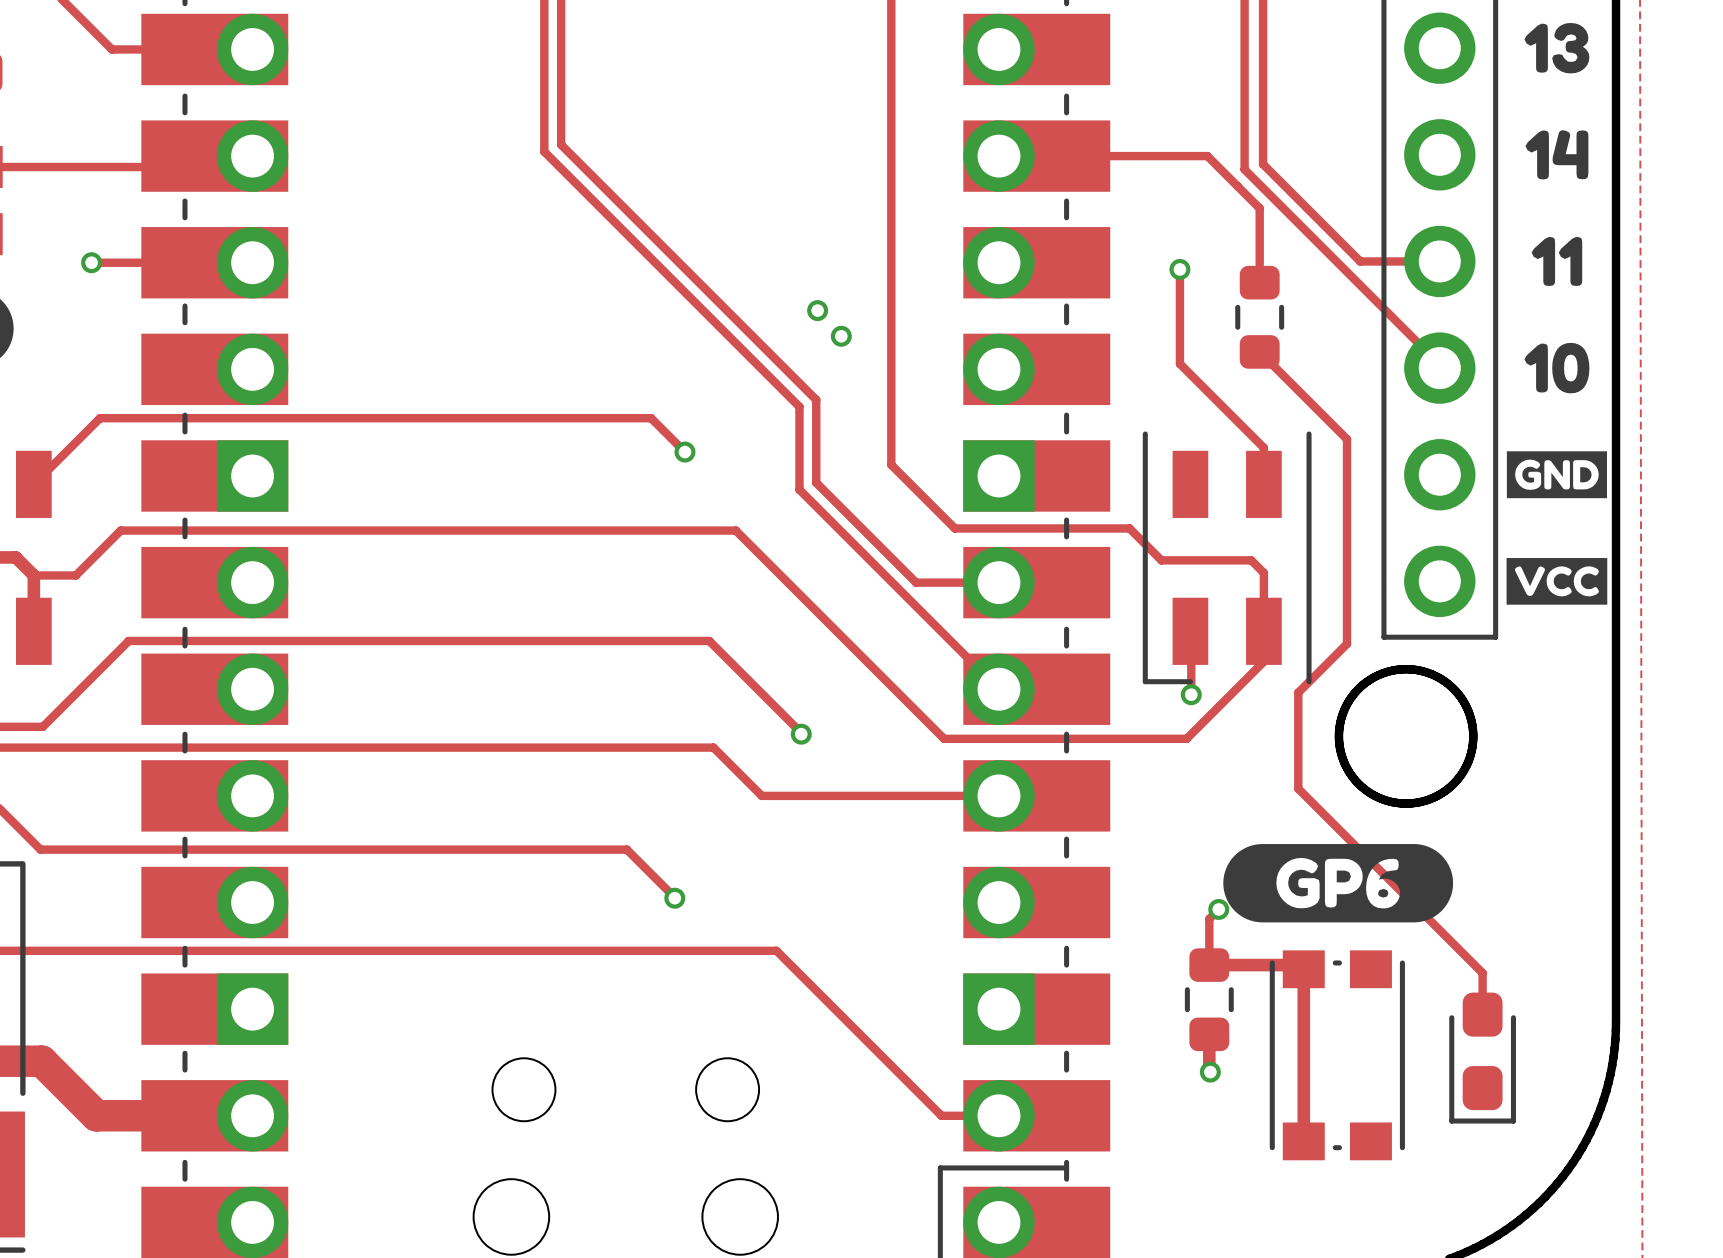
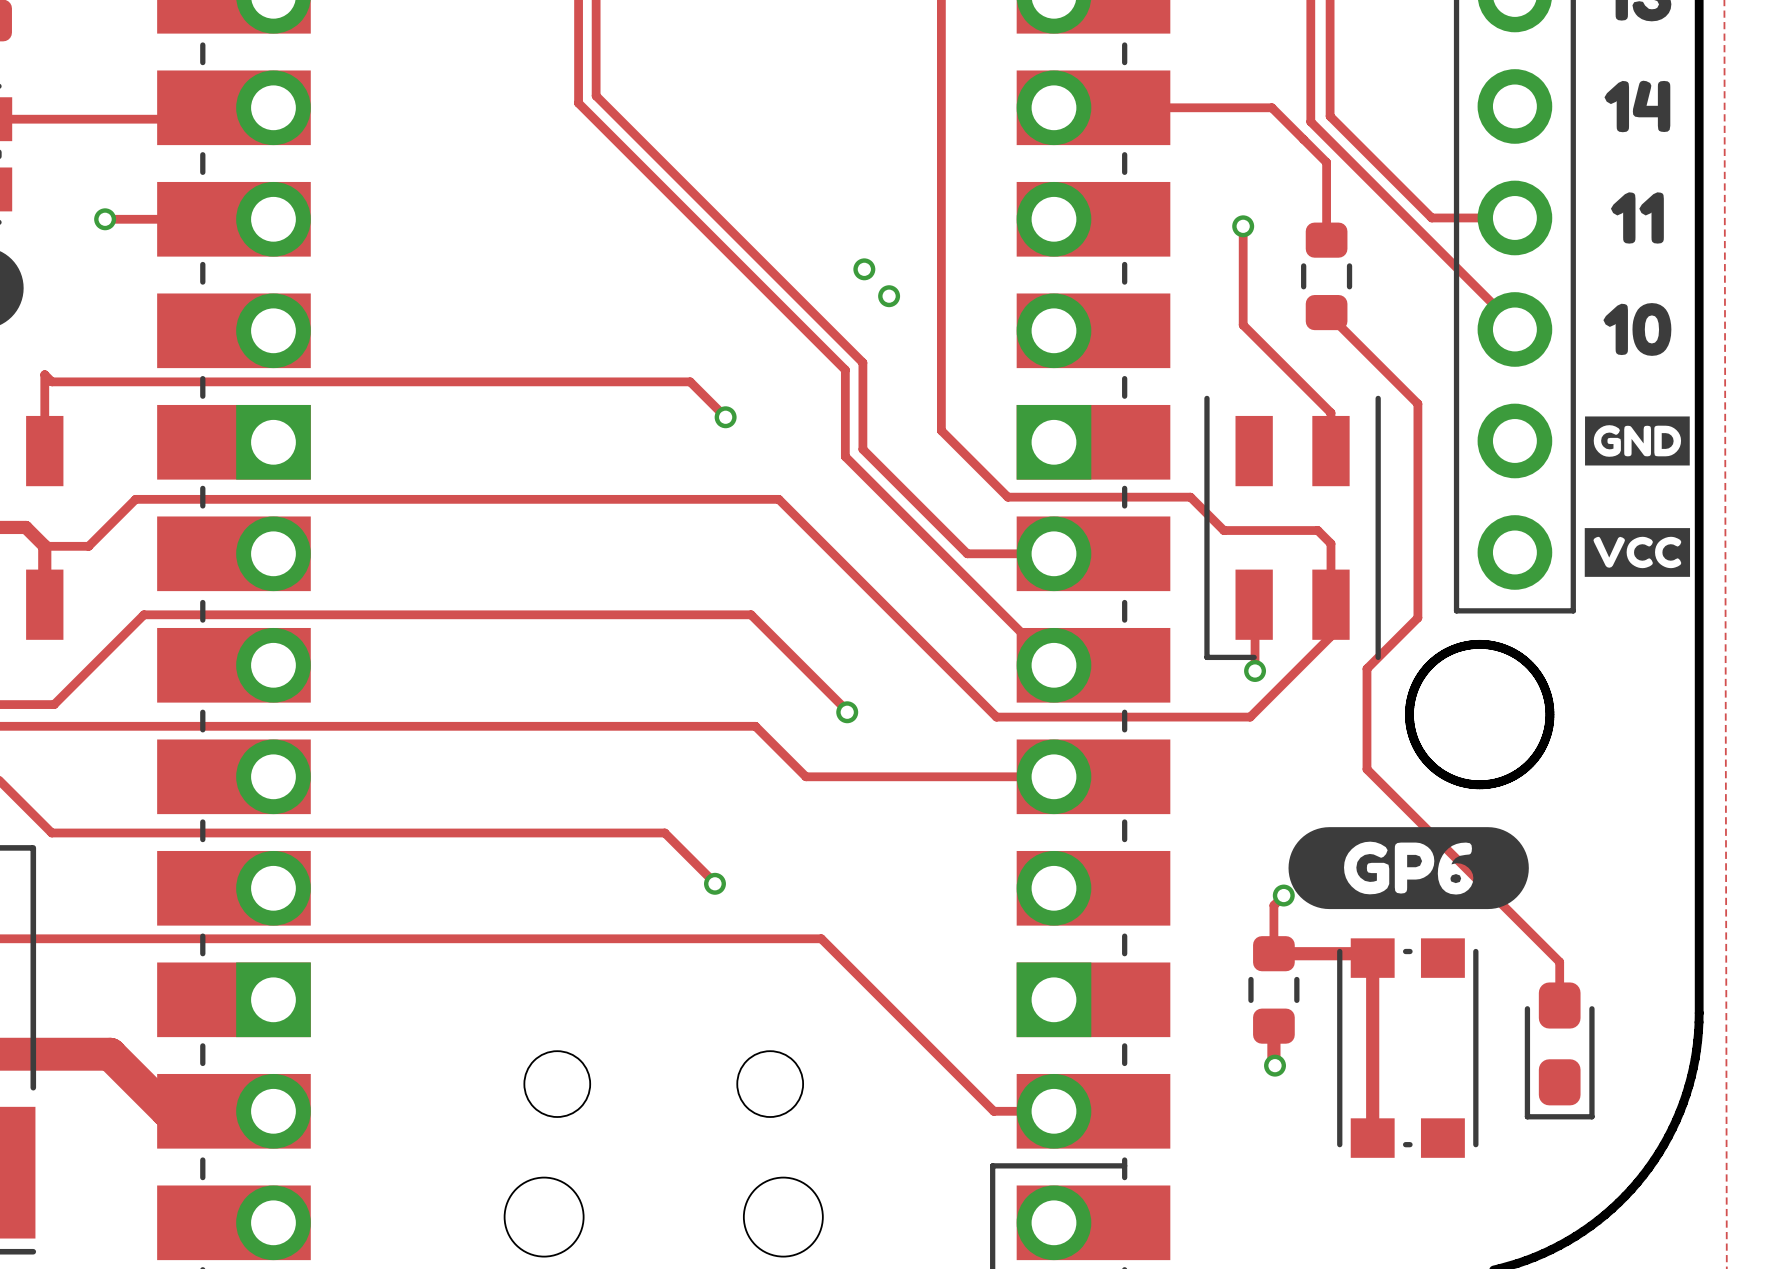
track: (100, 418) (33, 484) -> (113, 381) (51, 381) (44, 374) (44, 451)
track: (41, 1061) (96, 1115) (150, 1115) -> (53, 1054) (110, 1054) (167, 1111)

